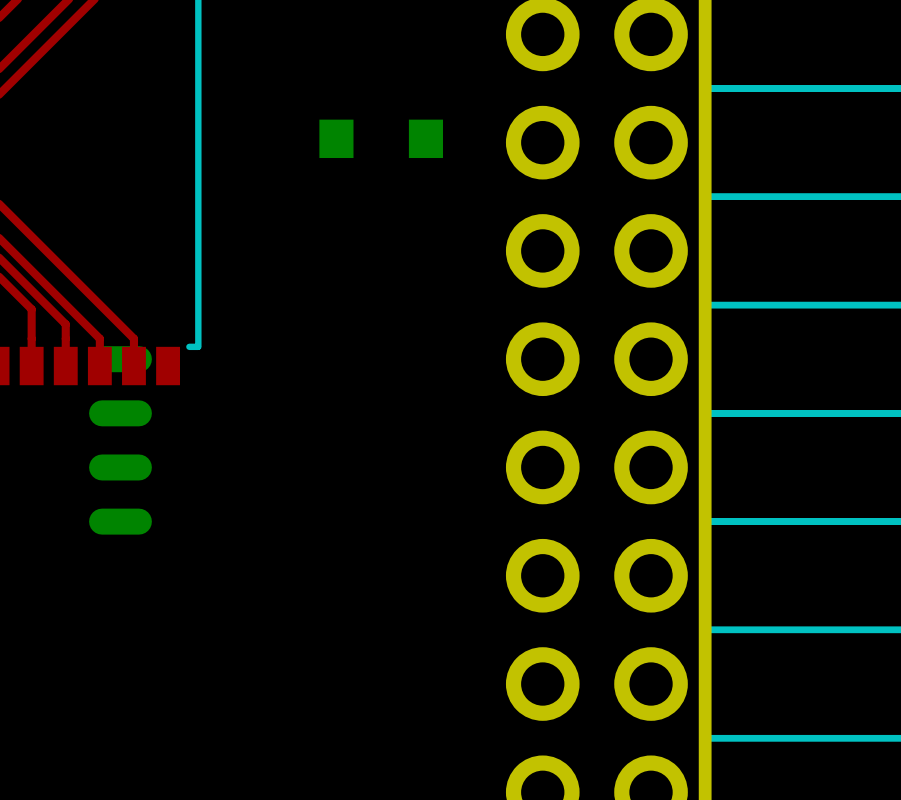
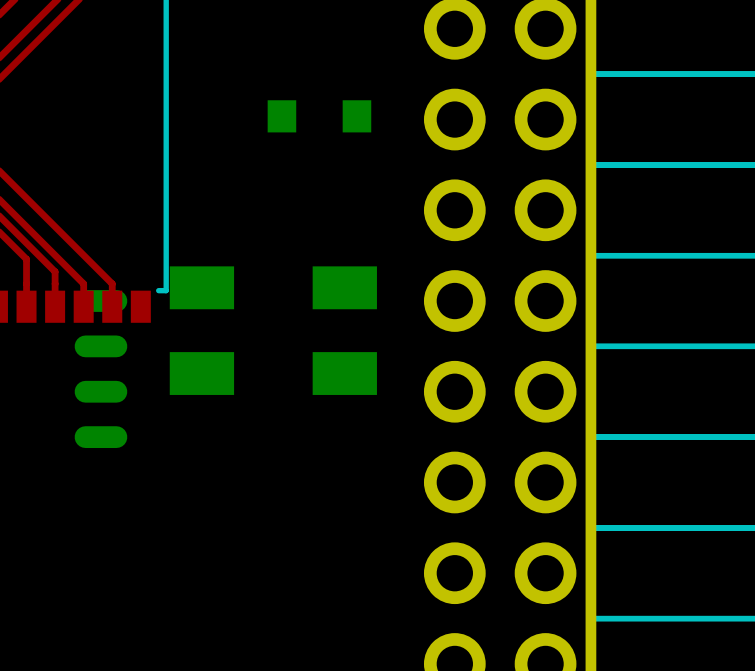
part: none -> (273, 330)

